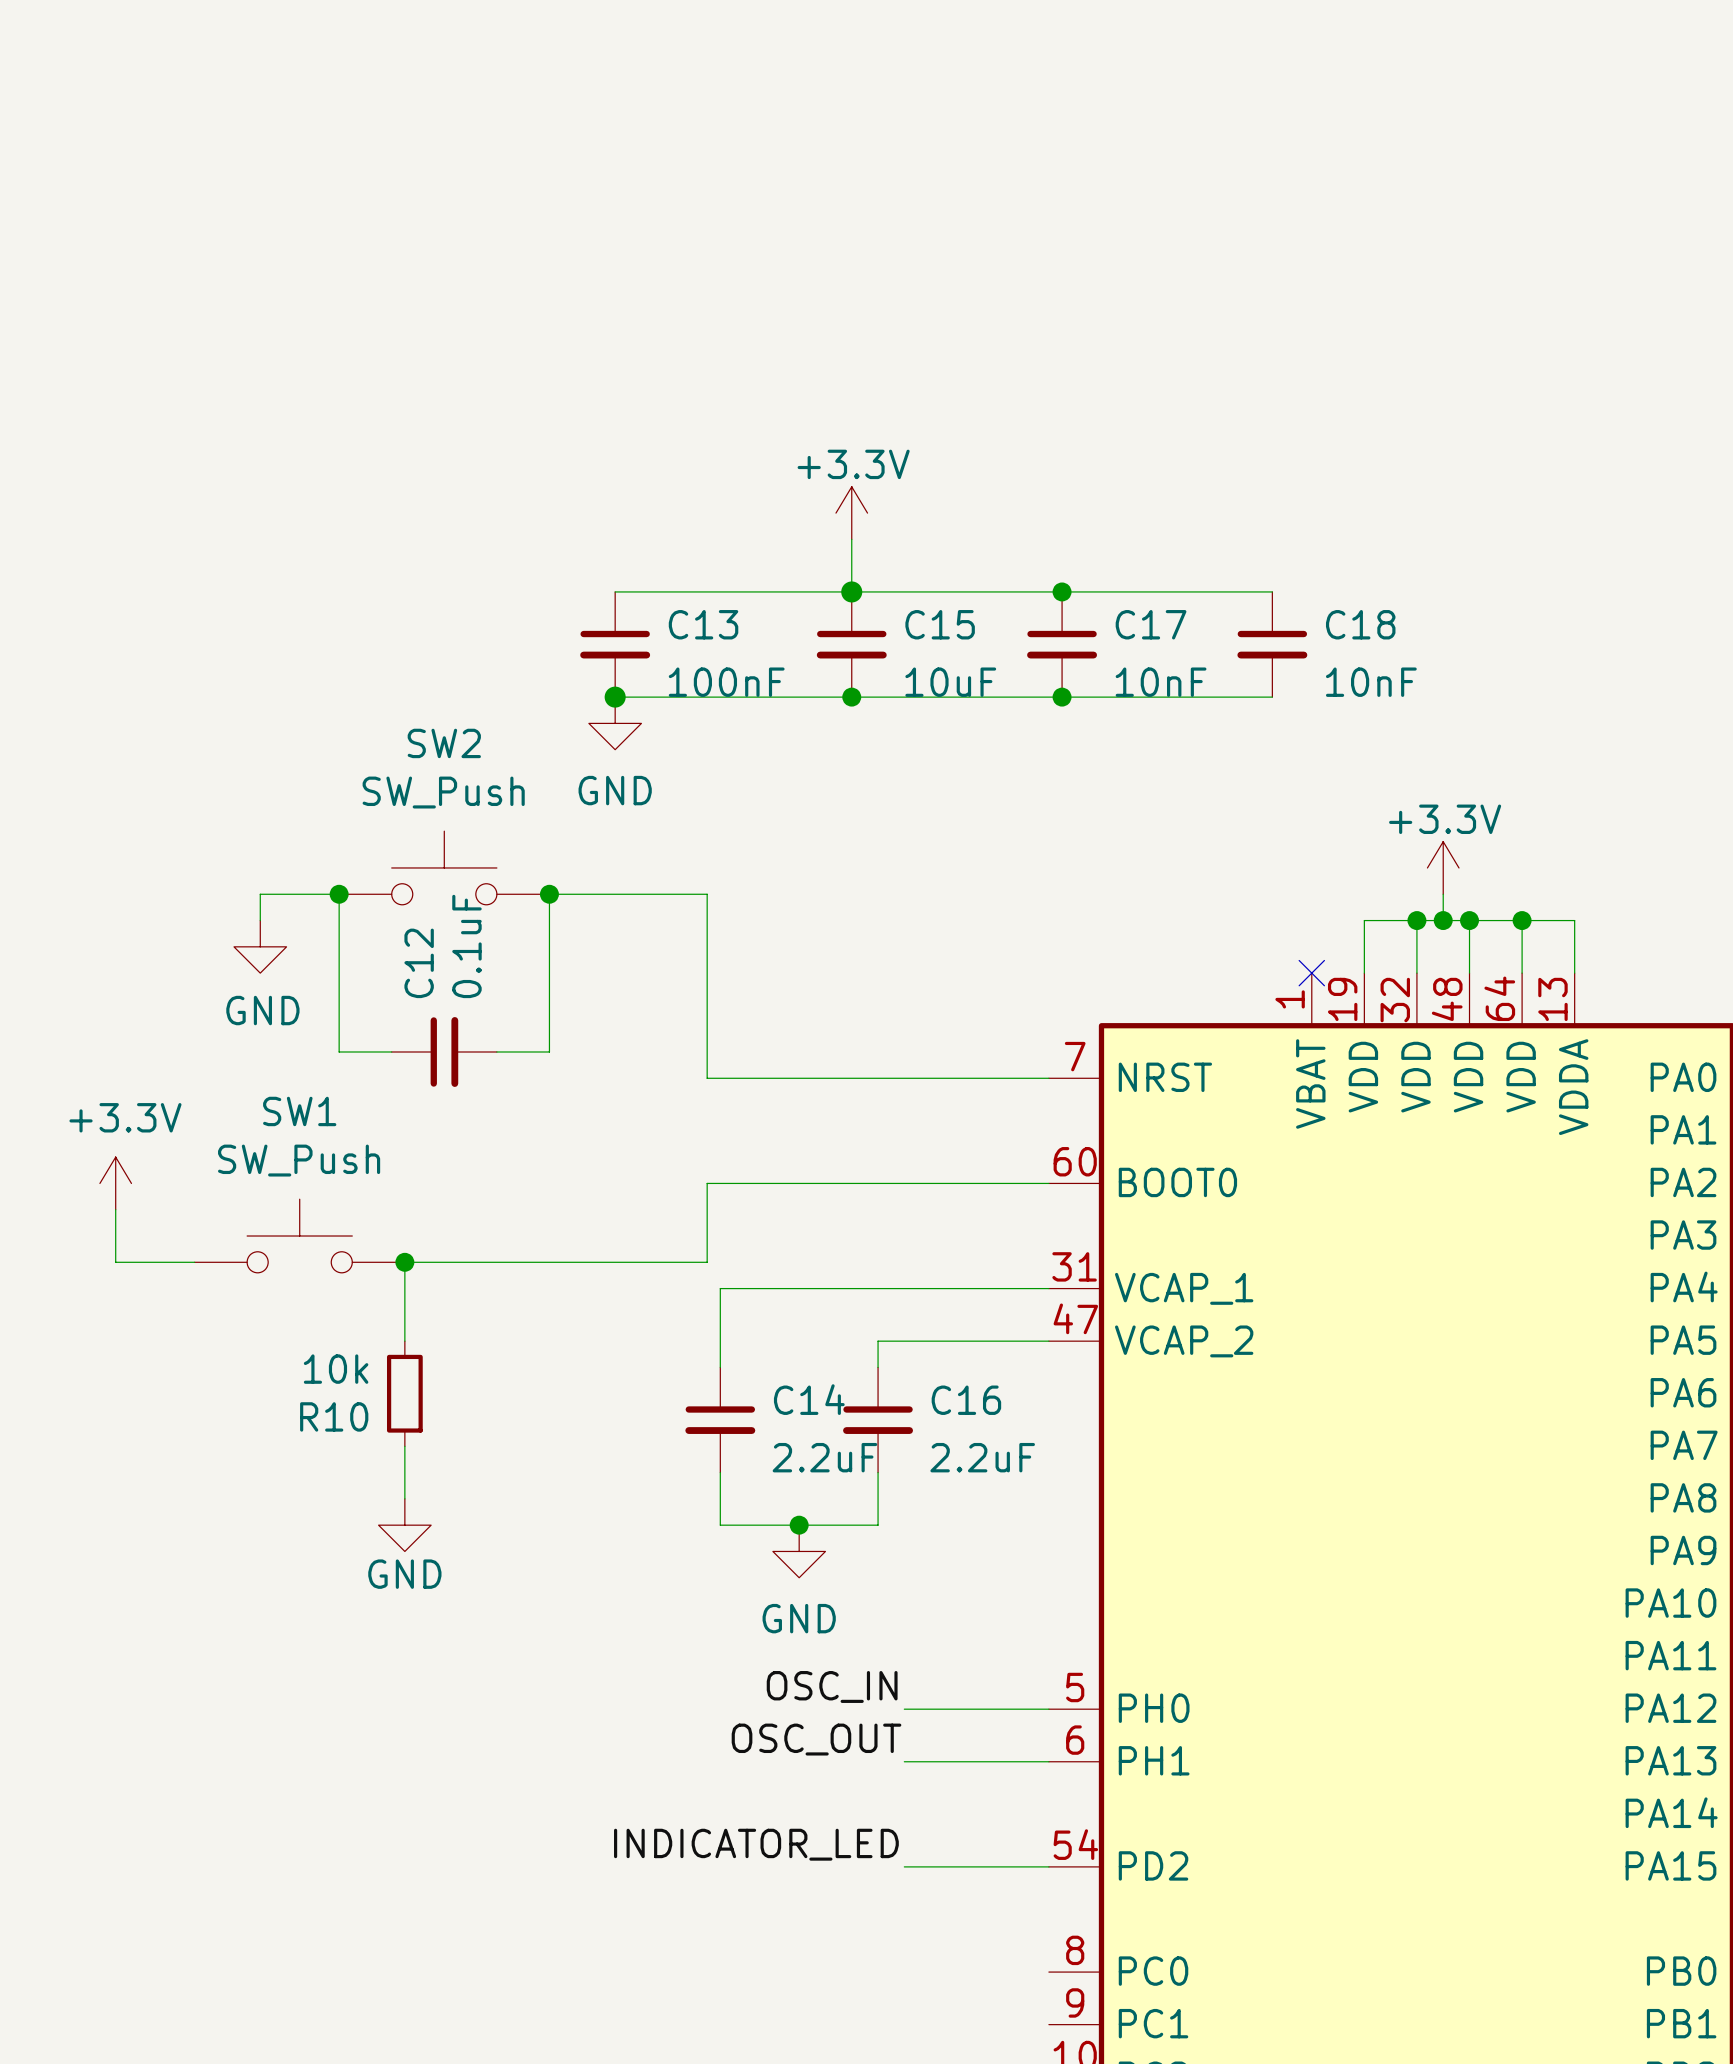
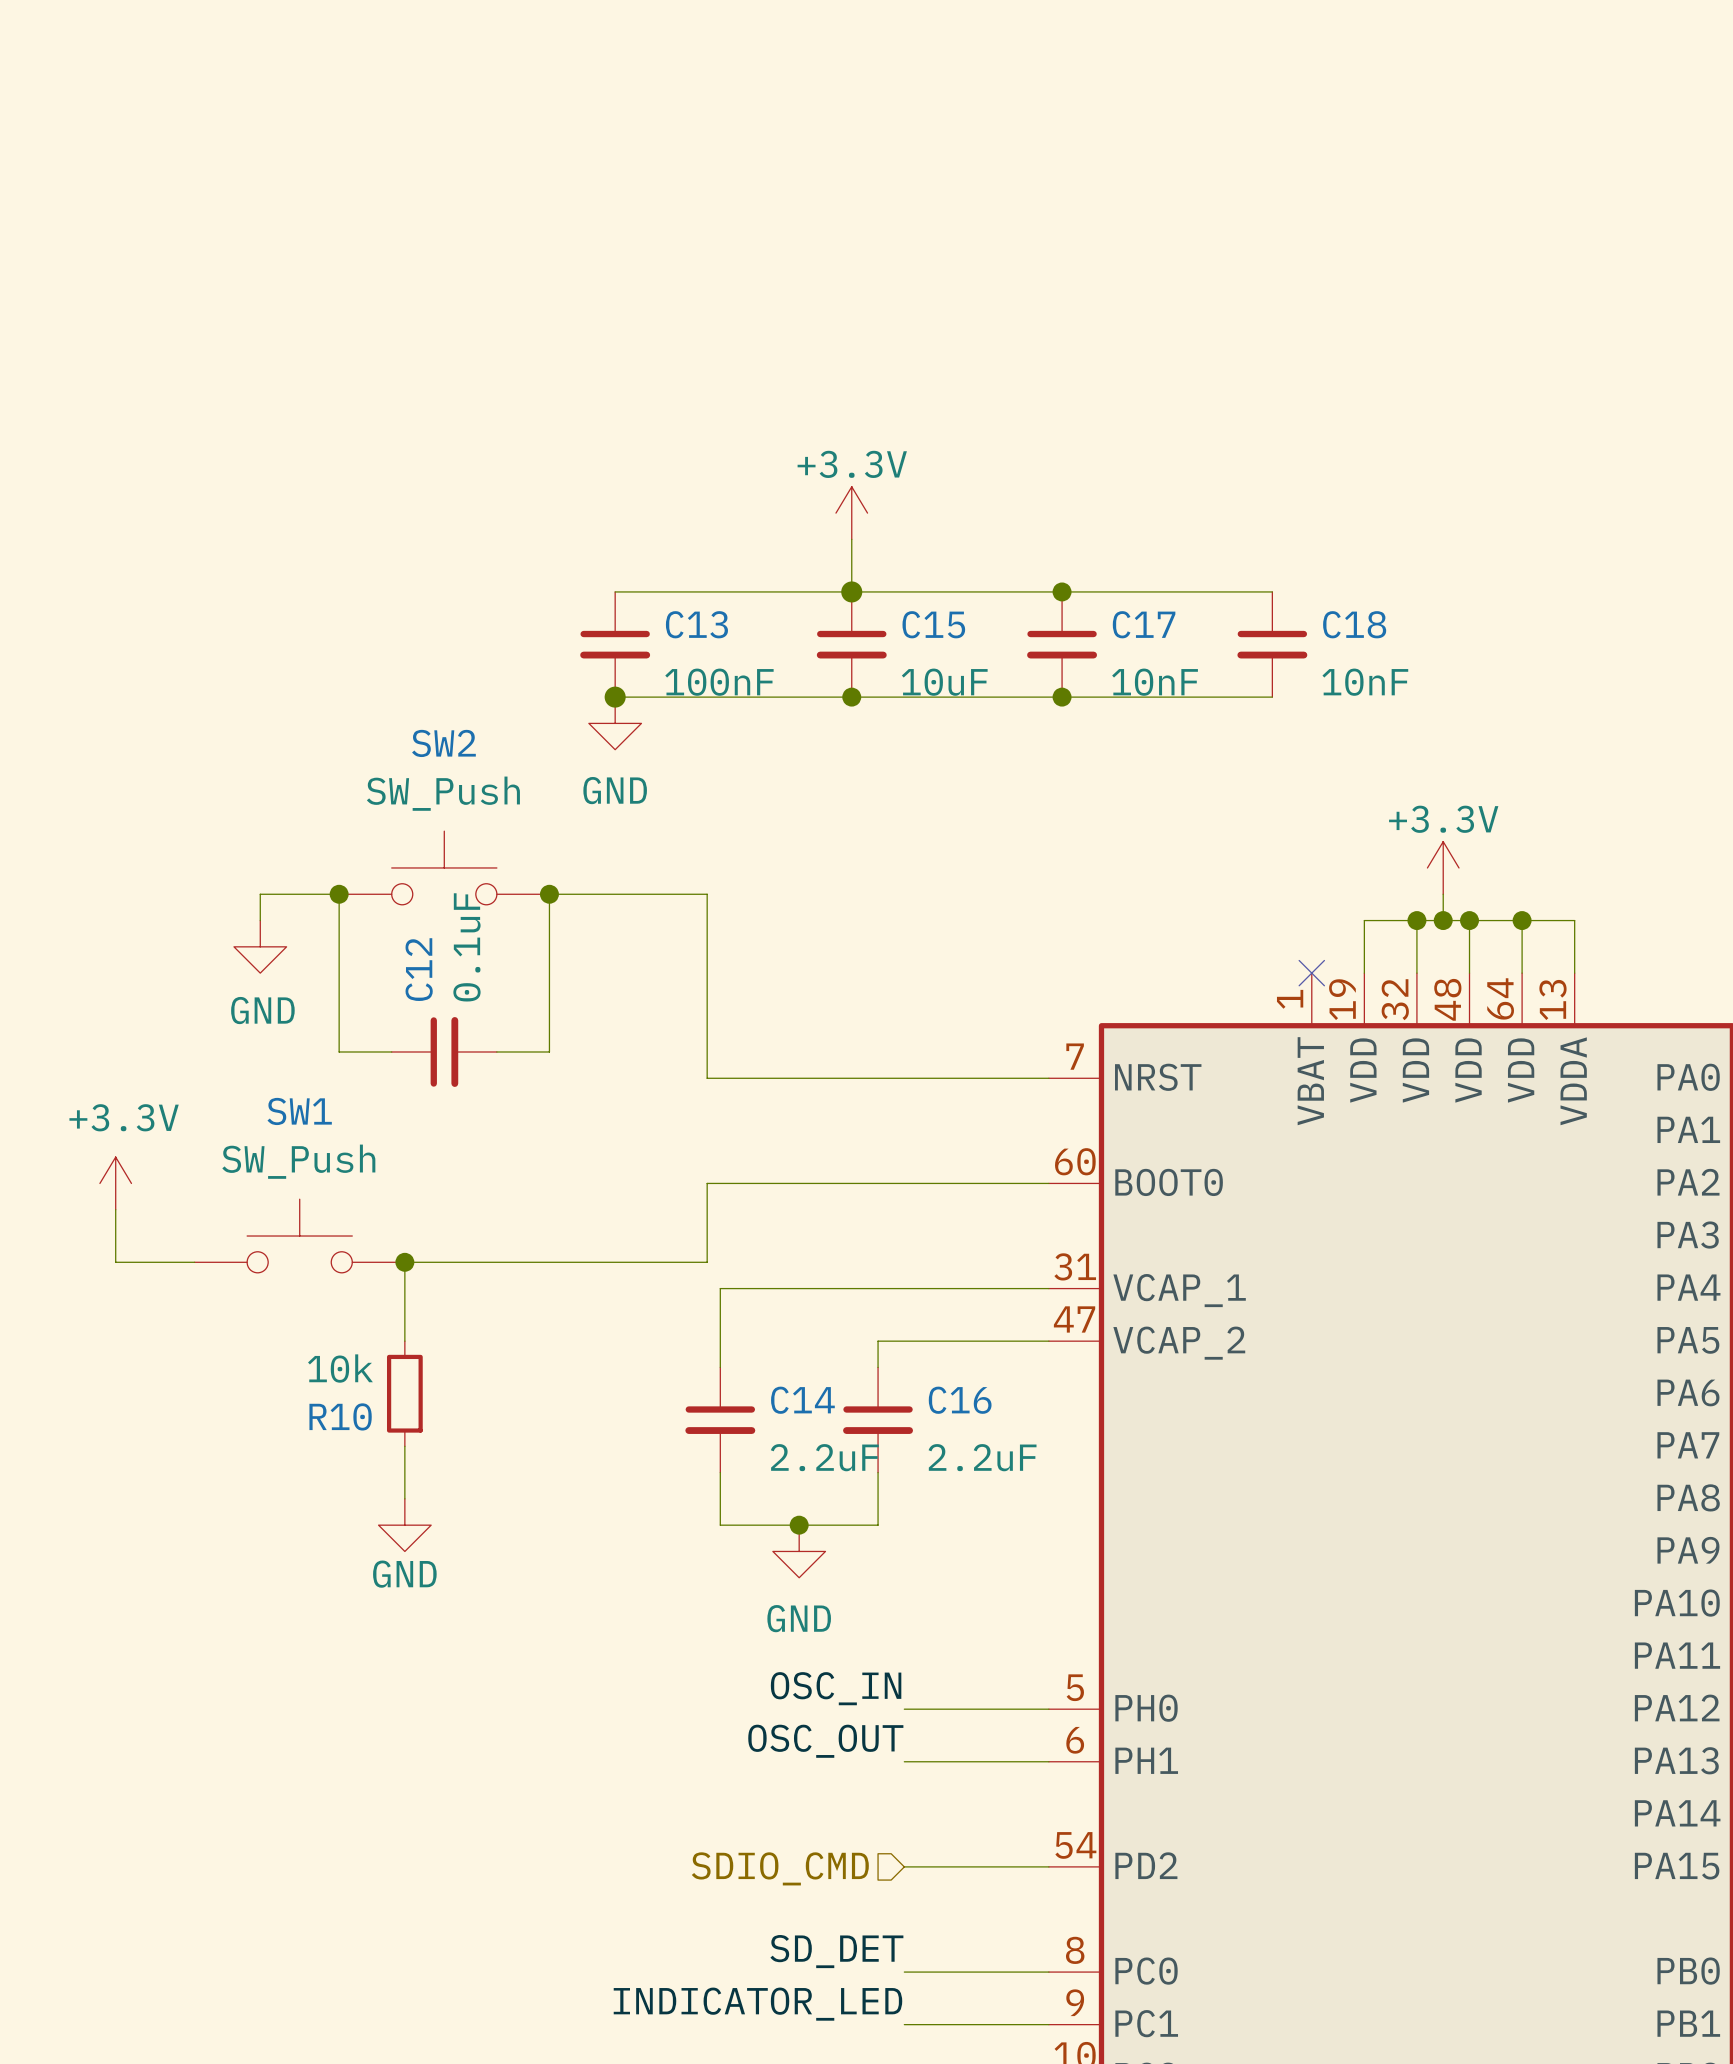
label position: INDICATOR_LED (756, 1844) -> INDICATOR_LED (757, 2004)
hierarchical label: none -> SDIO_CMD (780, 1868)
label: none -> SD_DET (836, 1951)
wire: none -> (904, 1972) (1048, 1972)
wire: none -> (904, 2024) (1048, 2024)

